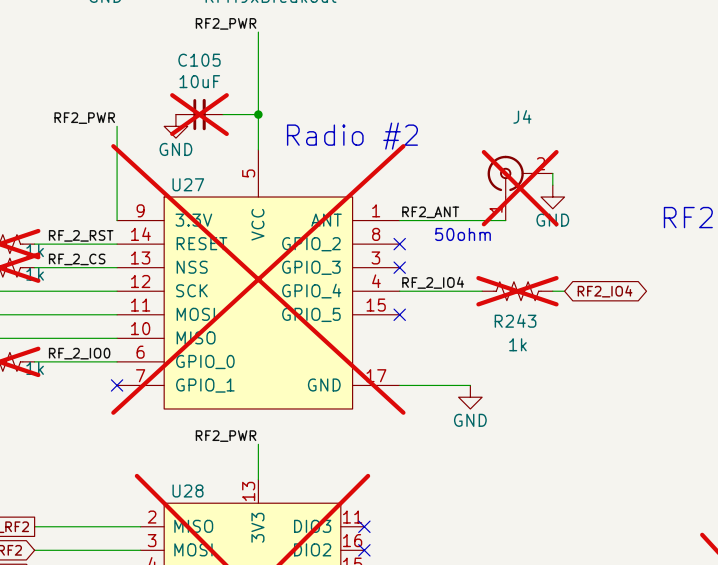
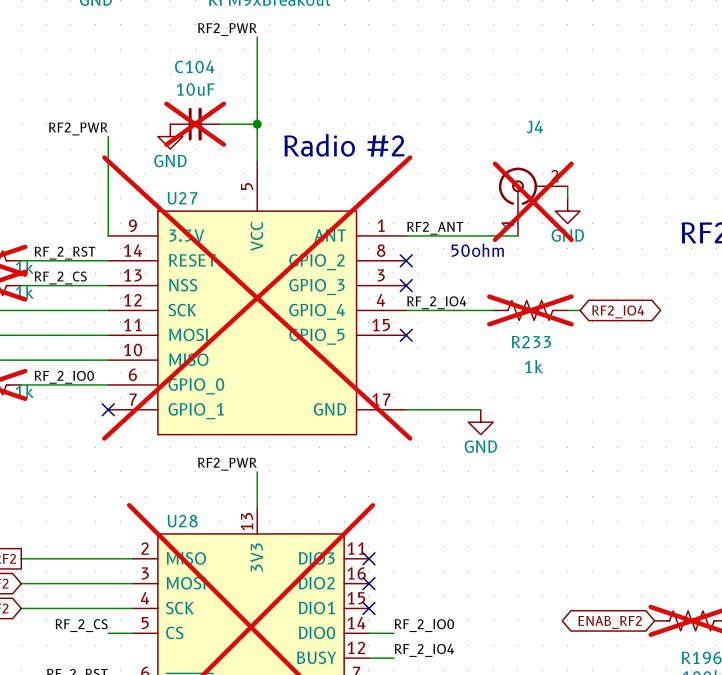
C105 name: C105 (199, 60) -> C104 (194, 66)
R243 name: R243 (515, 320) -> R233 (531, 342)

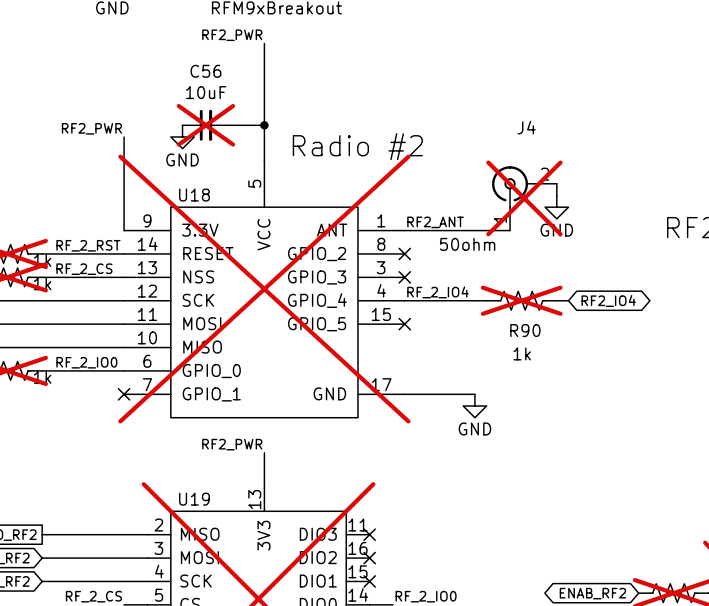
C104 name: C104 (194, 66) -> C56 (205, 71)
U27 name: U27 (182, 198) -> U18 (194, 195)
R233 name: R233 (531, 342) -> R90 (525, 330)
U28 name: U28 (182, 521) -> U19 (194, 499)

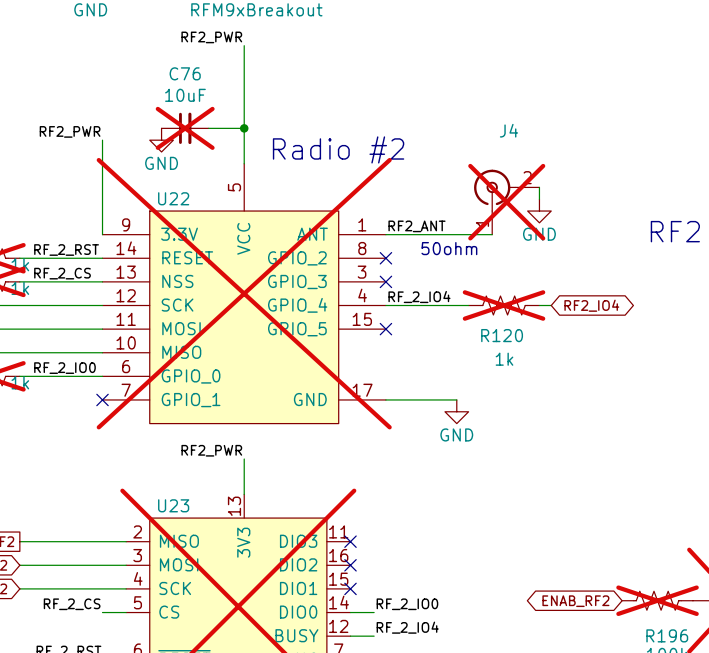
C56 name: C56 (205, 71) -> C76 (185, 73)
U18 name: U18 (194, 195) -> U22 (173, 198)
R90 name: R90 (525, 330) -> R120 (502, 335)
U19 name: U19 (194, 499) -> U23 (173, 505)

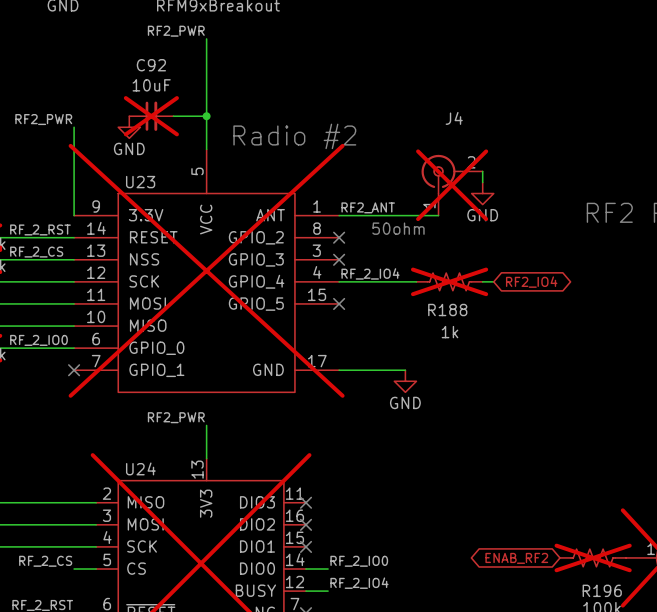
C76 name: C76 (185, 73) -> C92 (151, 65)
U22 name: U22 (173, 198) -> U23 (140, 182)
R120 name: R120 (502, 335) -> R188 (447, 310)
U23 name: U23 (173, 505) -> U24 (140, 468)

